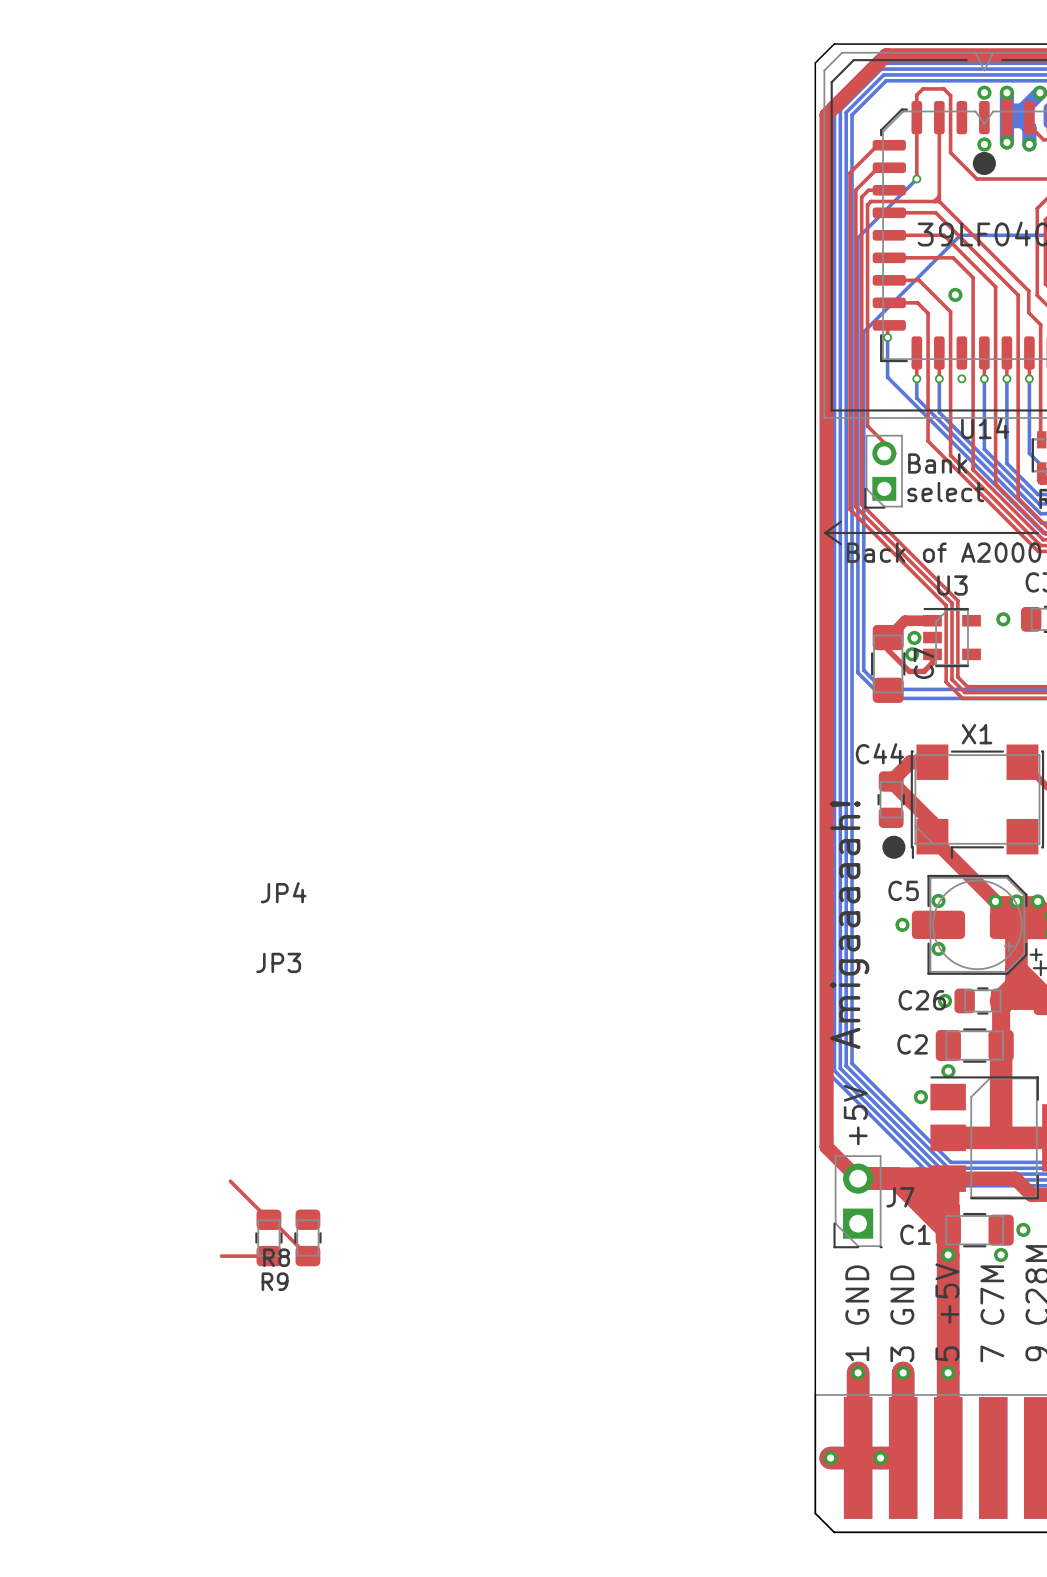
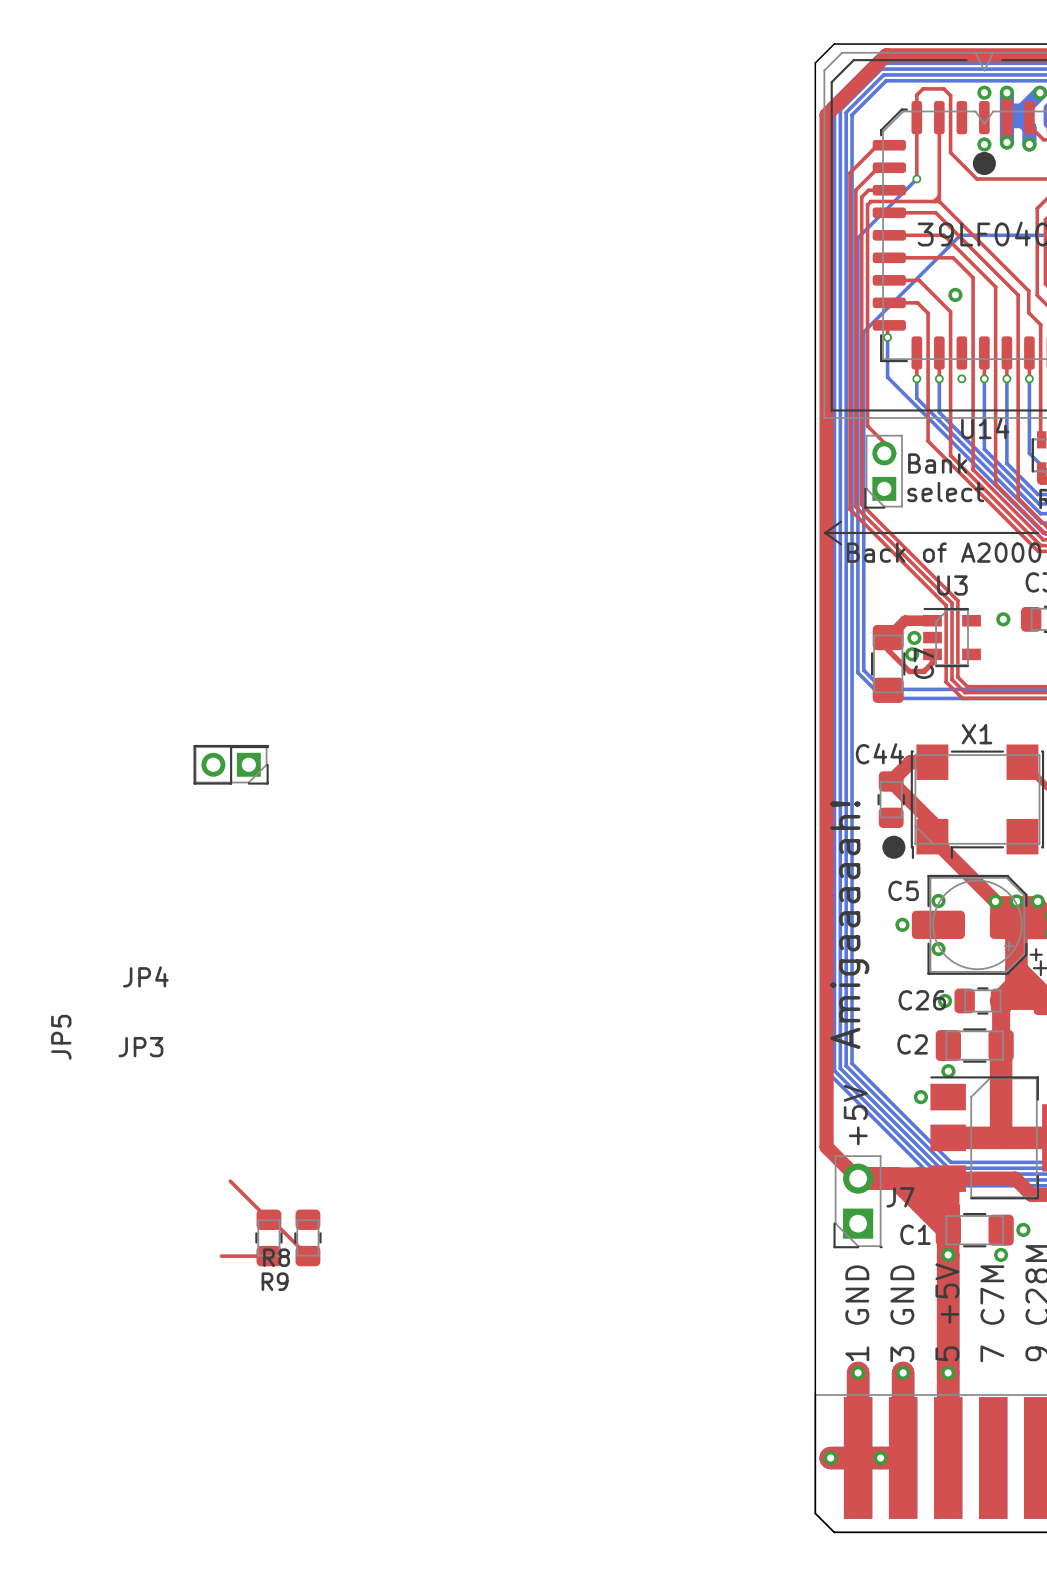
part: none -> (231, 764)
text position: JP4 (283, 892) -> JP4 (145, 976)
text position: JP3 (278, 962) -> JP3 (140, 1047)
text: none -> JP5 (61, 1037)

